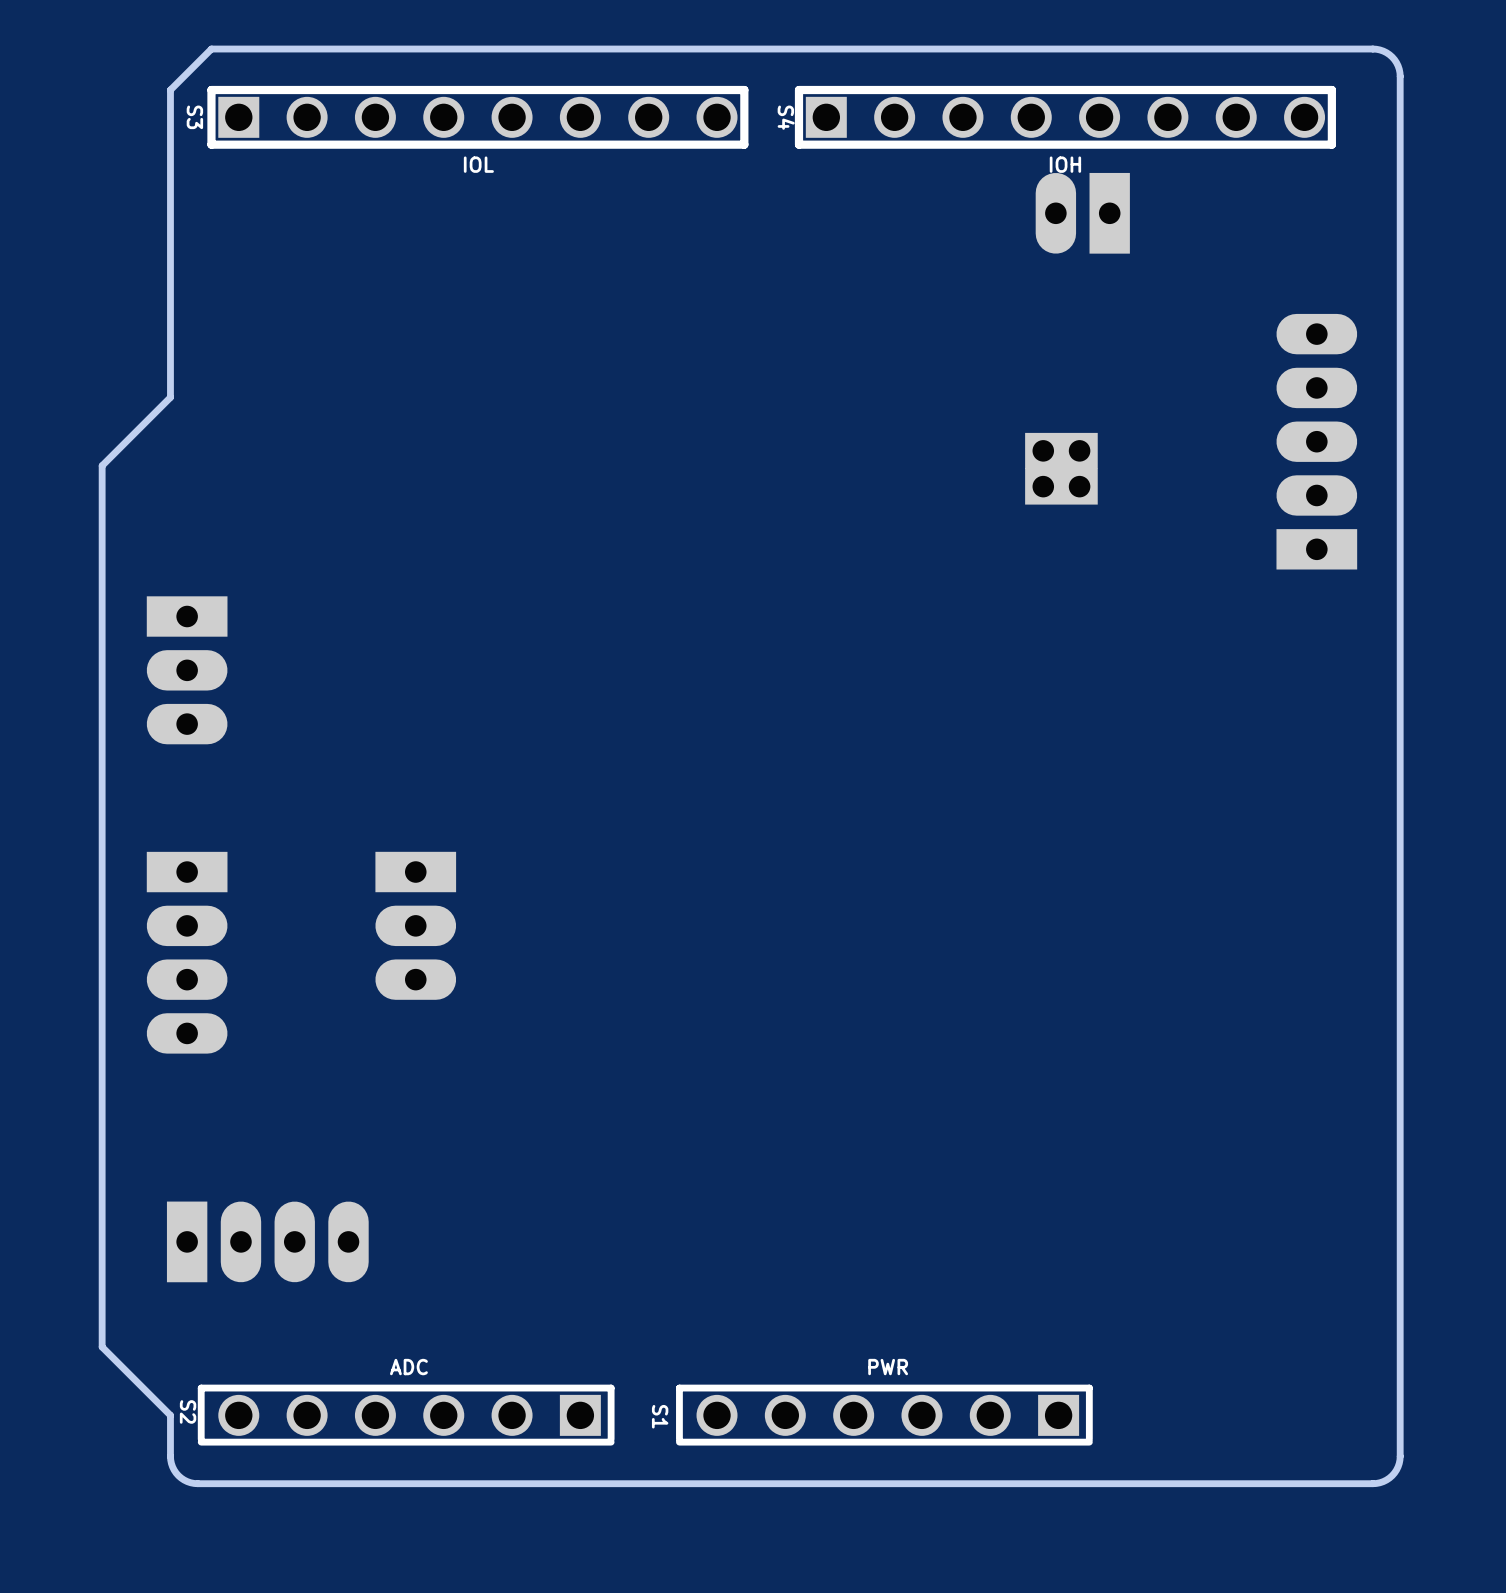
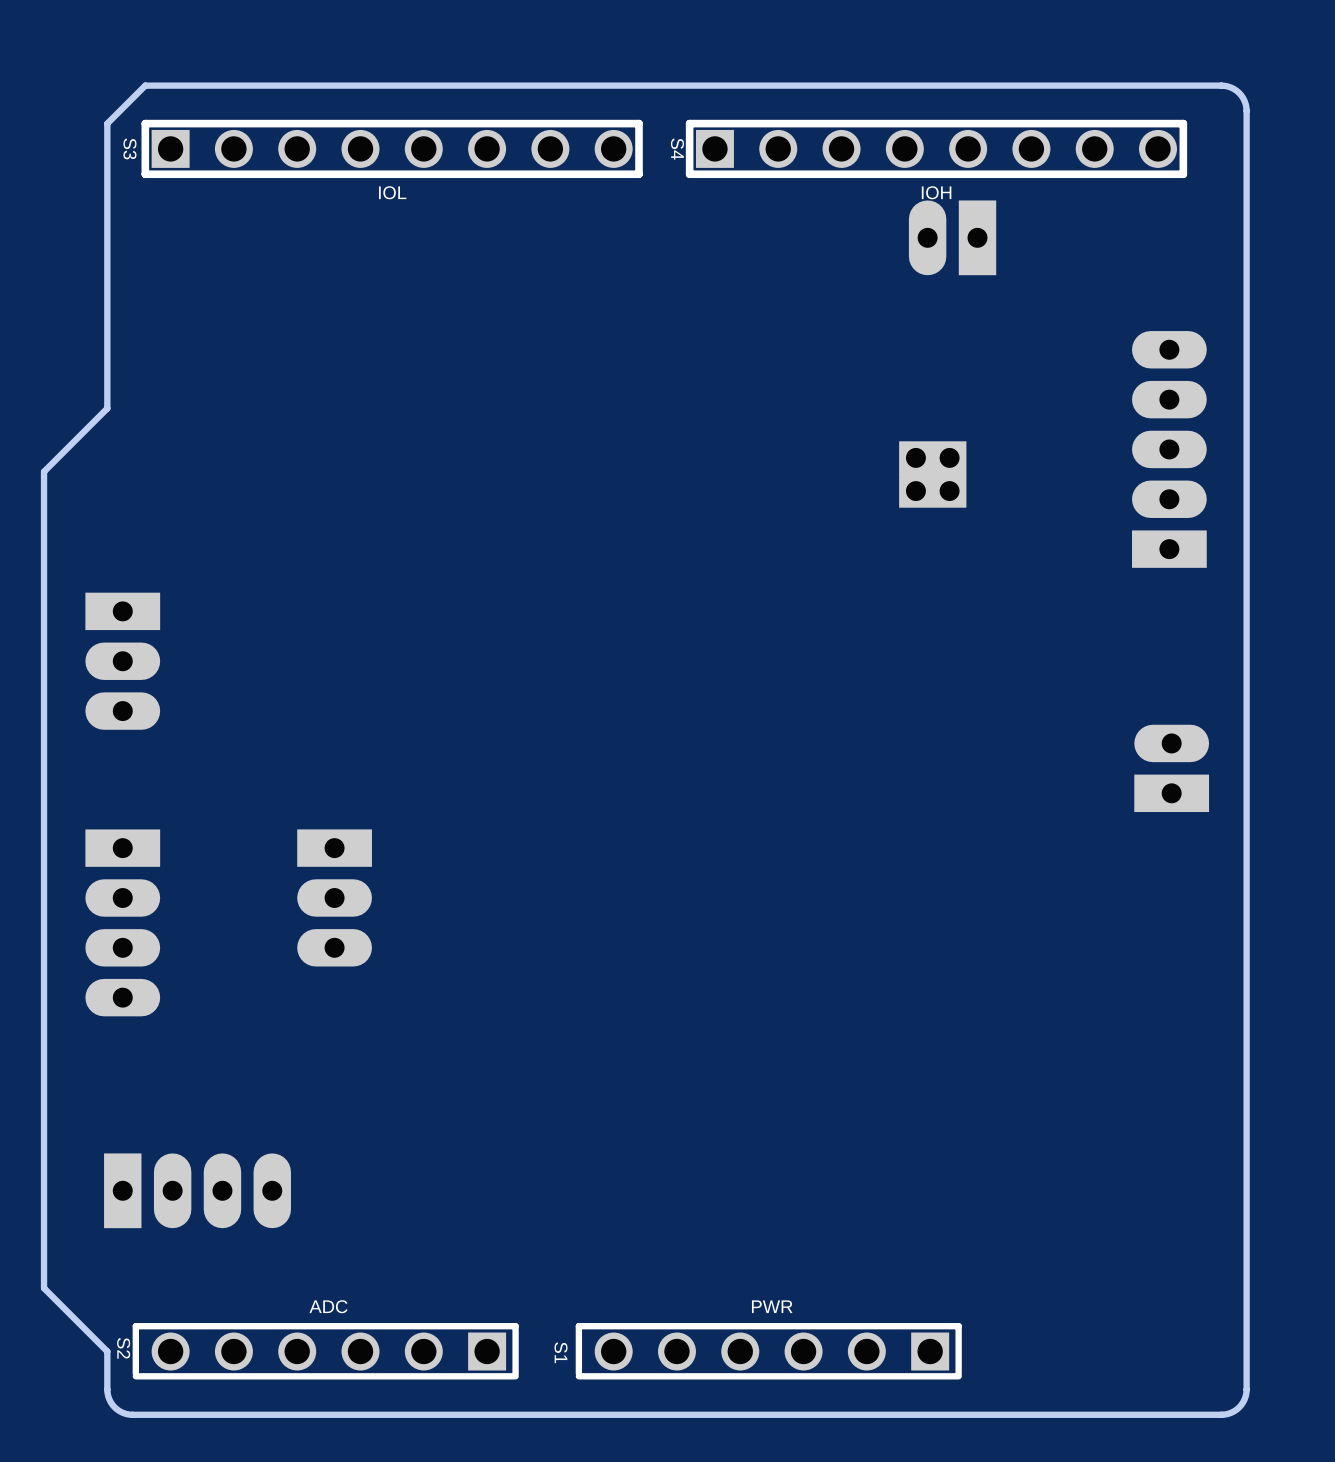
part: none -> (1171, 768)

